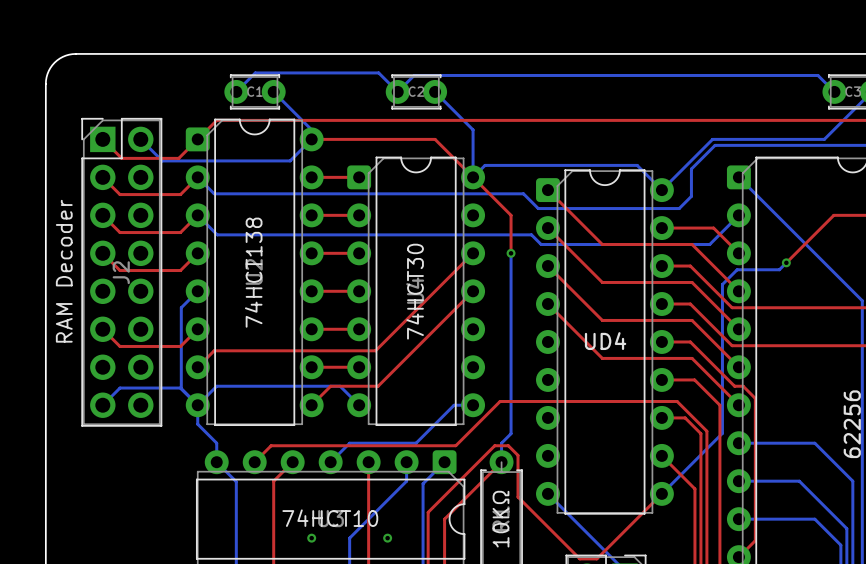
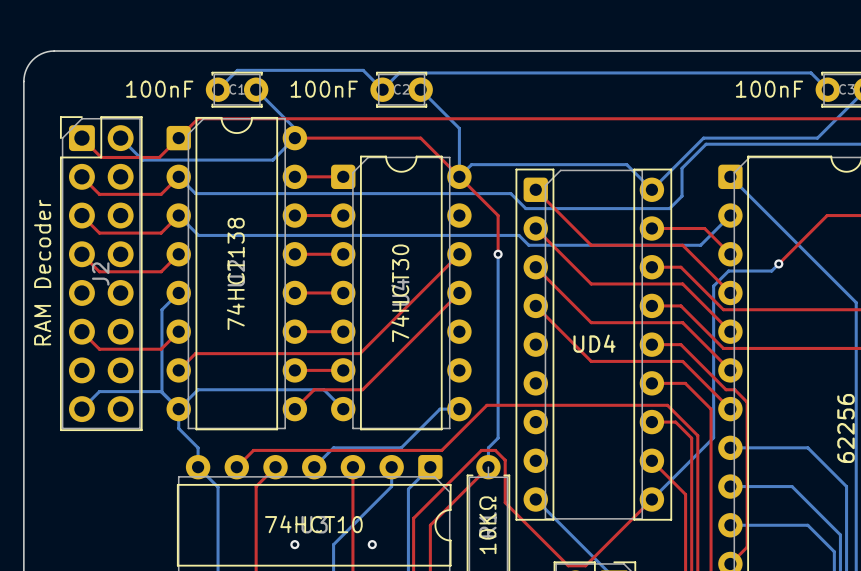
C1 value: none -> 100nF (159, 89)
C2 value: none -> 100nF (324, 89)
C3 value: none -> 100nF (769, 89)
J2 footprint: [81, 117, 163, 427] -> [59, 116, 143, 432]
part footprint: [536, 169, 674, 515] -> [515, 168, 673, 521]

